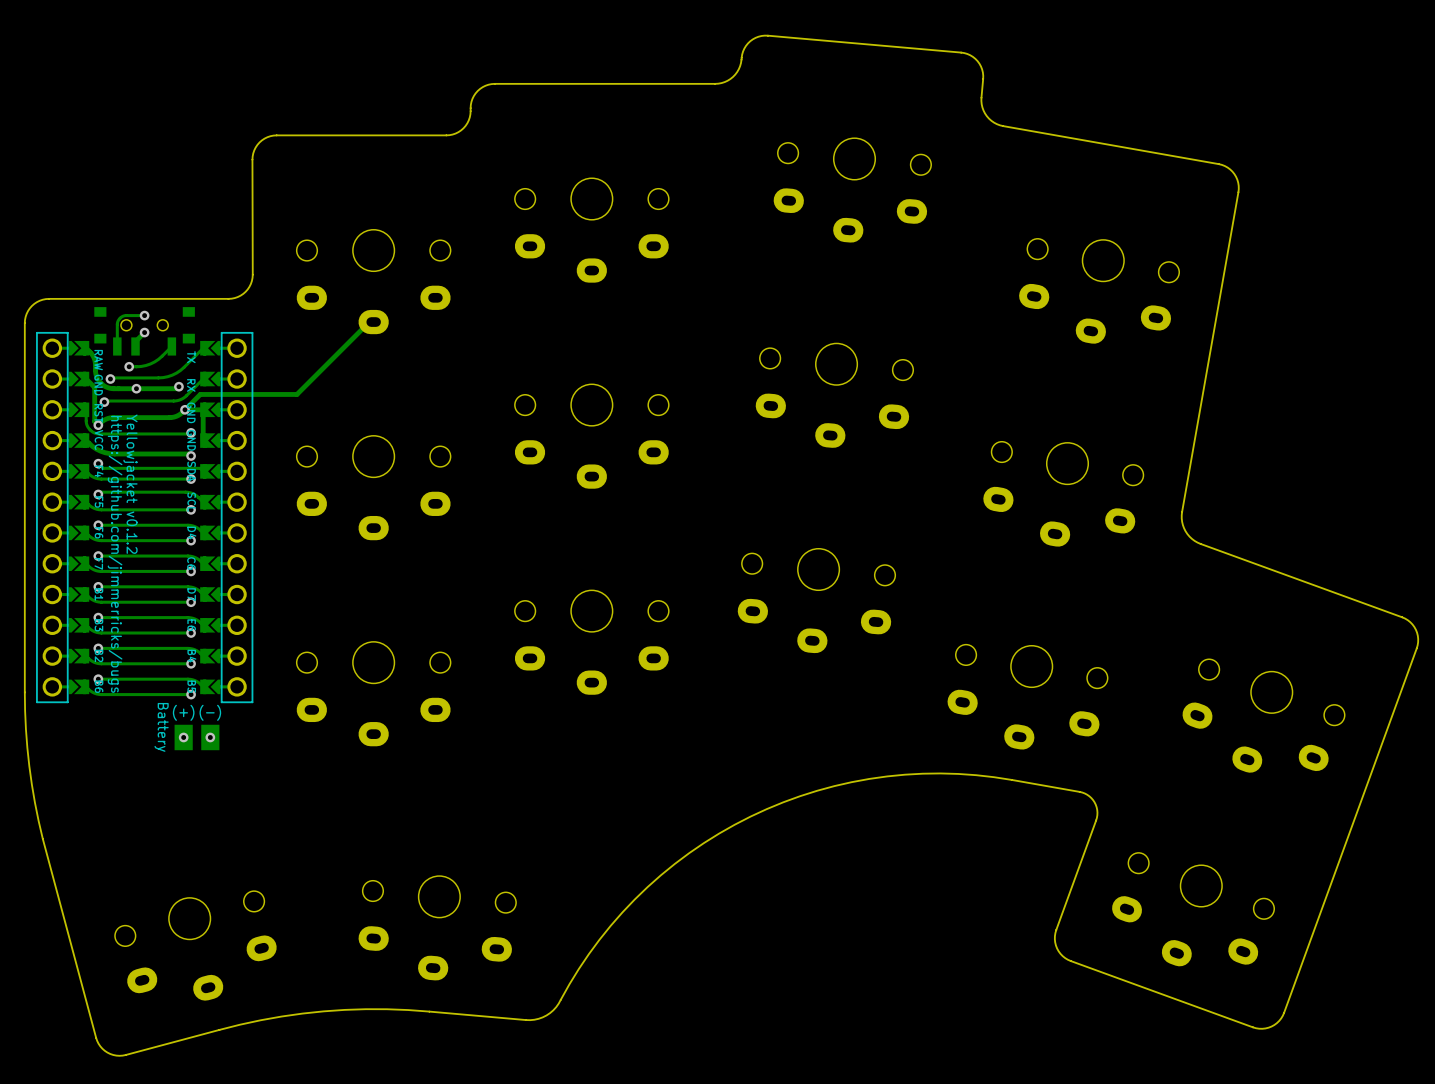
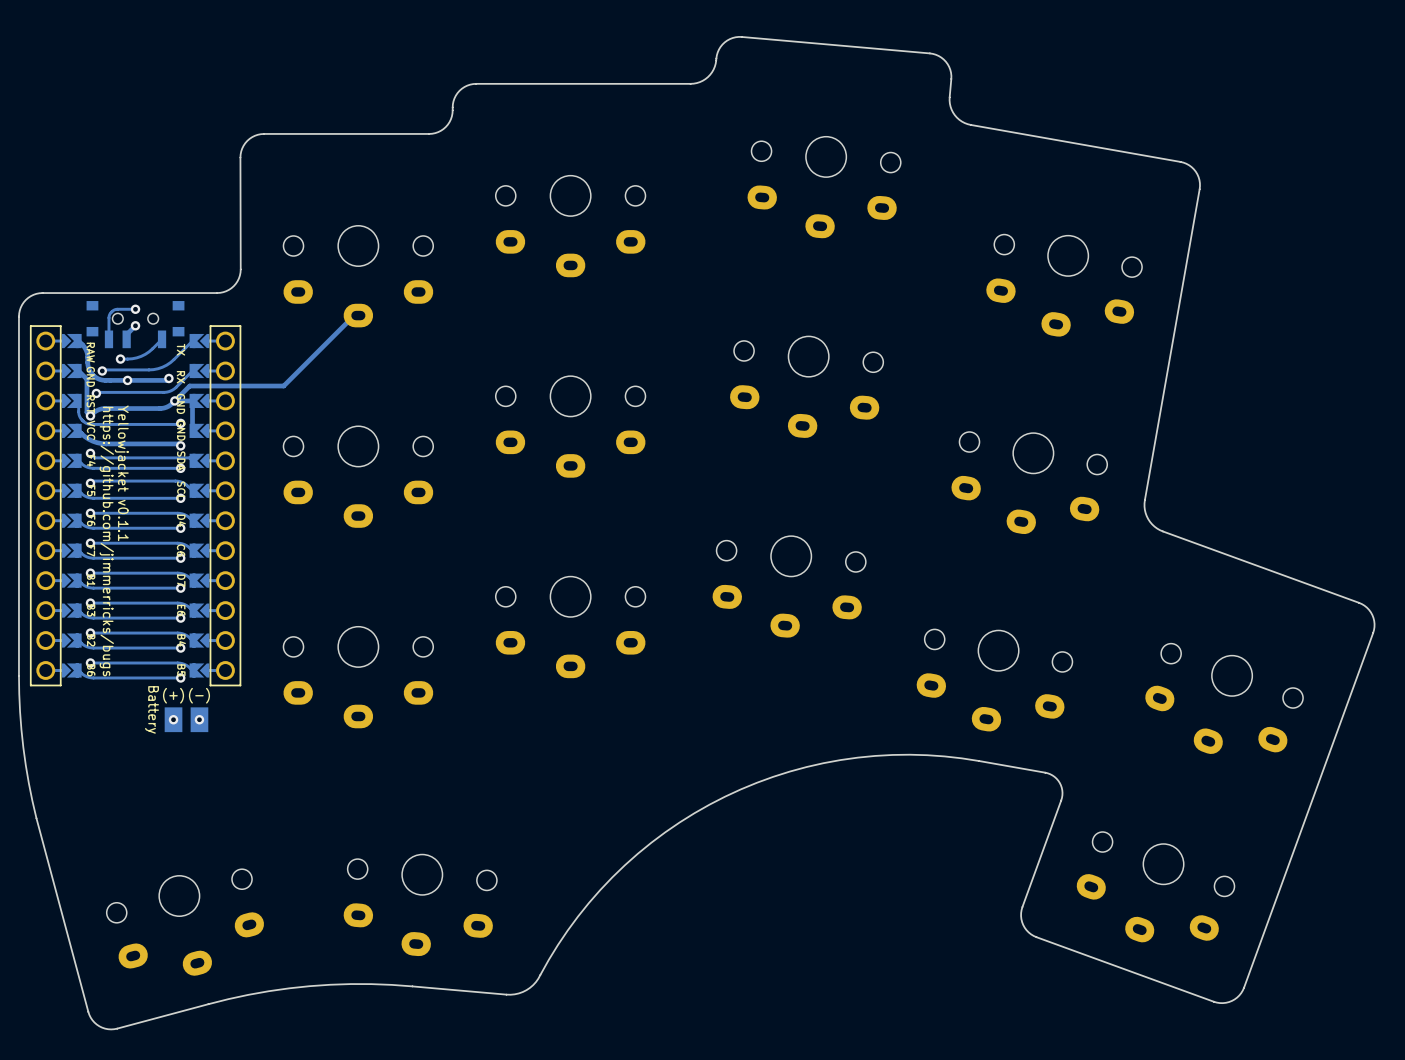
text: Yellowjacket v0.1.2 (130, 484) -> Yellowjacket v0.1.1 (121, 473)

